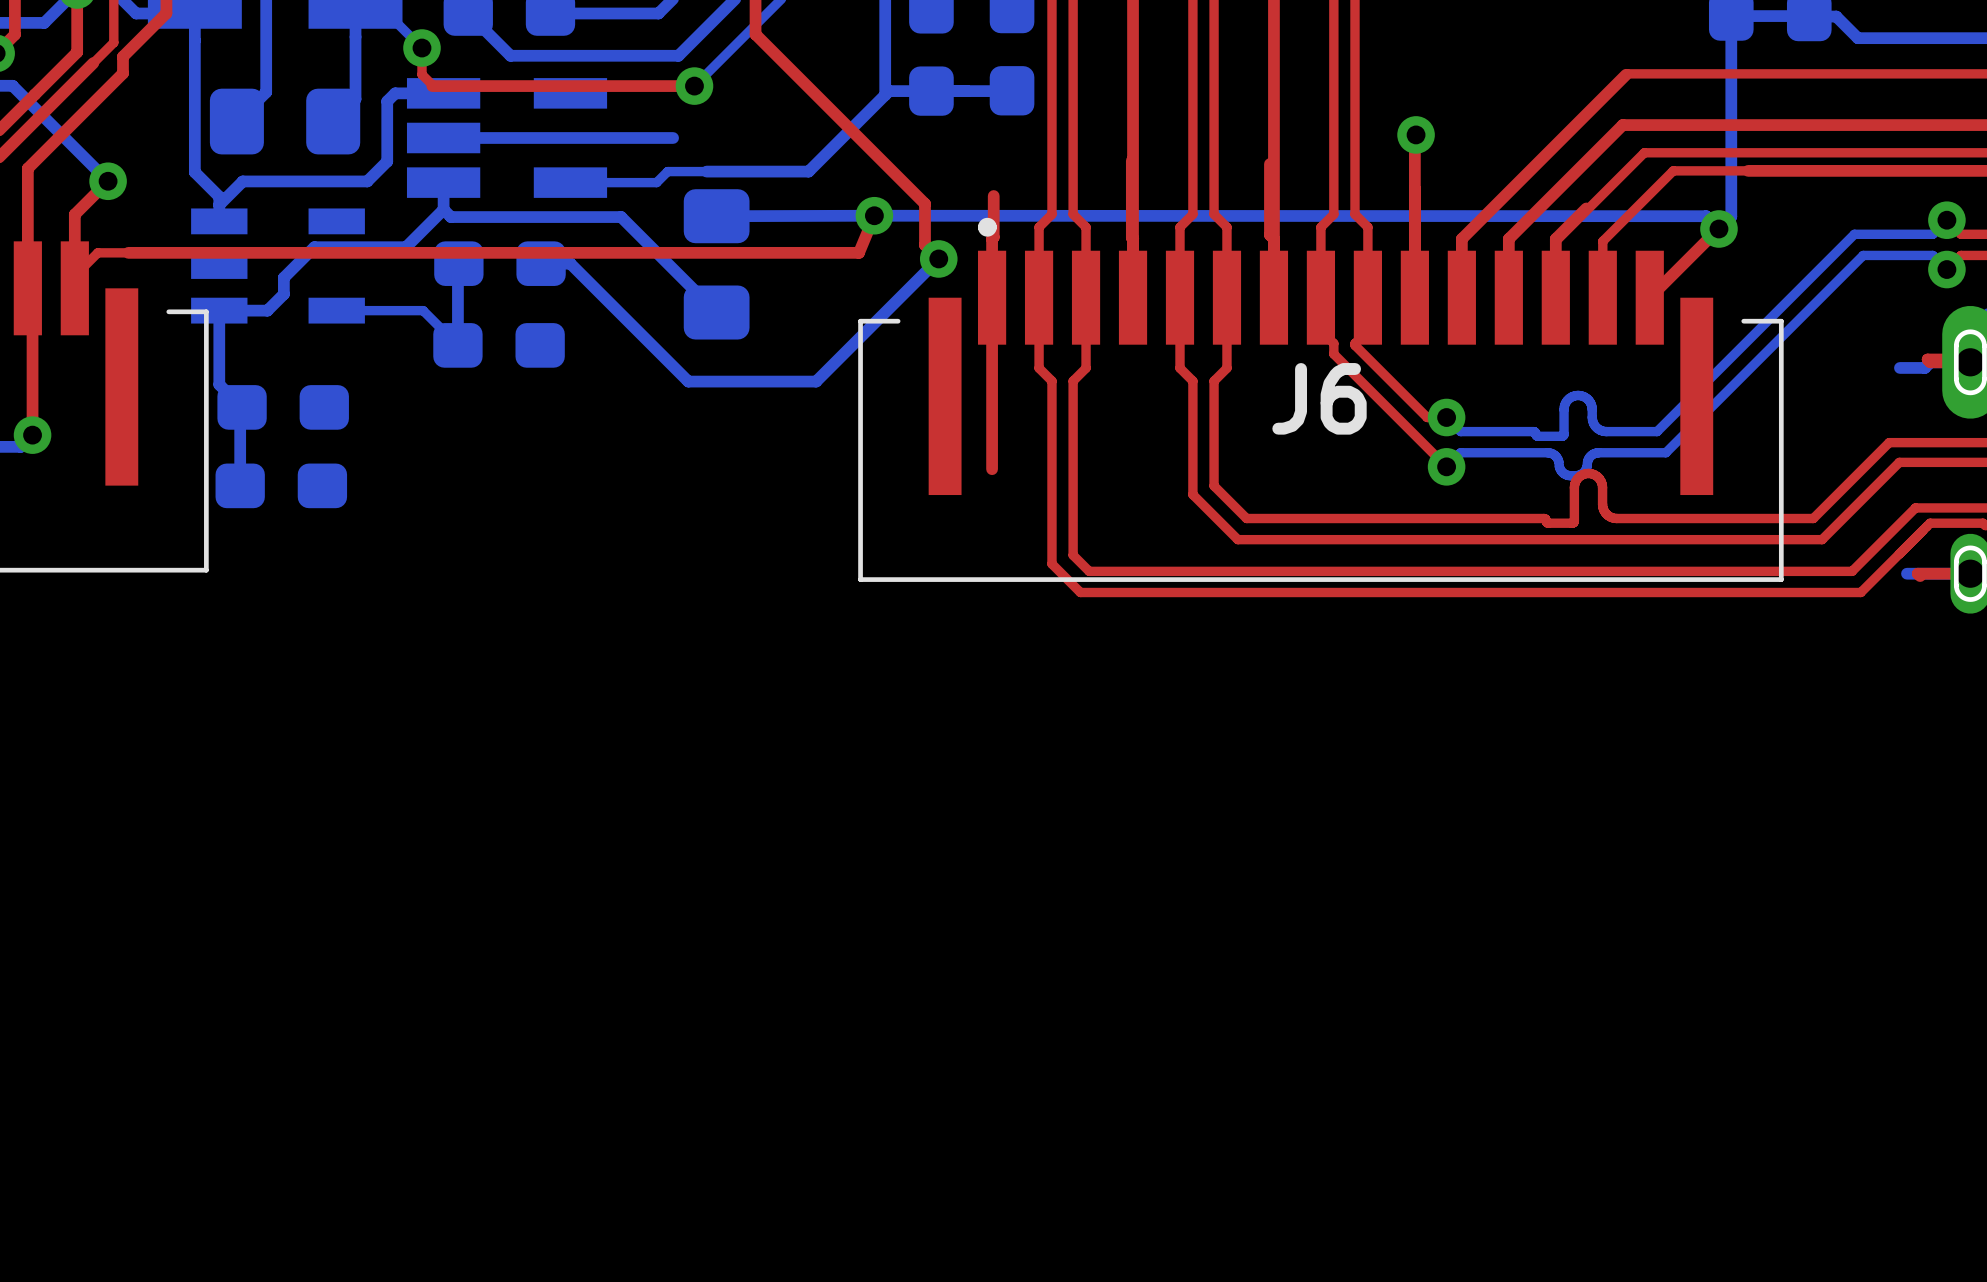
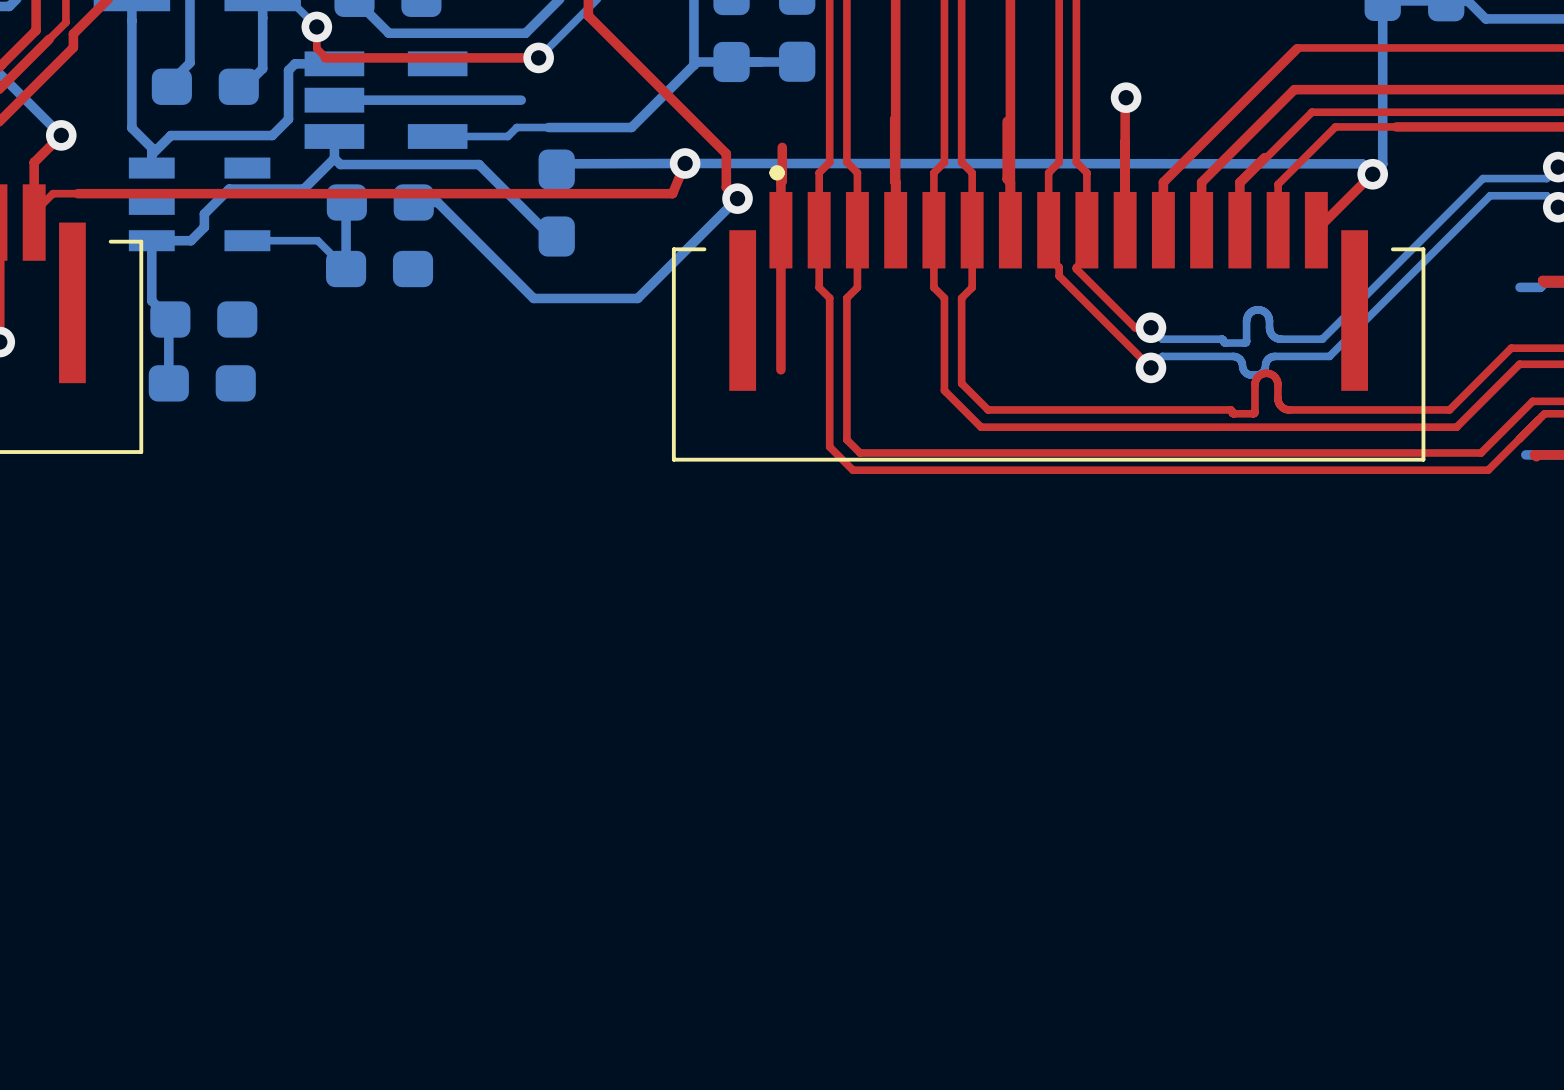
part footprint: [209, 88, 361, 155] -> [151, 68, 259, 105]
part footprint: [683, 189, 750, 340] -> [538, 149, 575, 257]
J6 name: J6 (1319, 398) -> none

